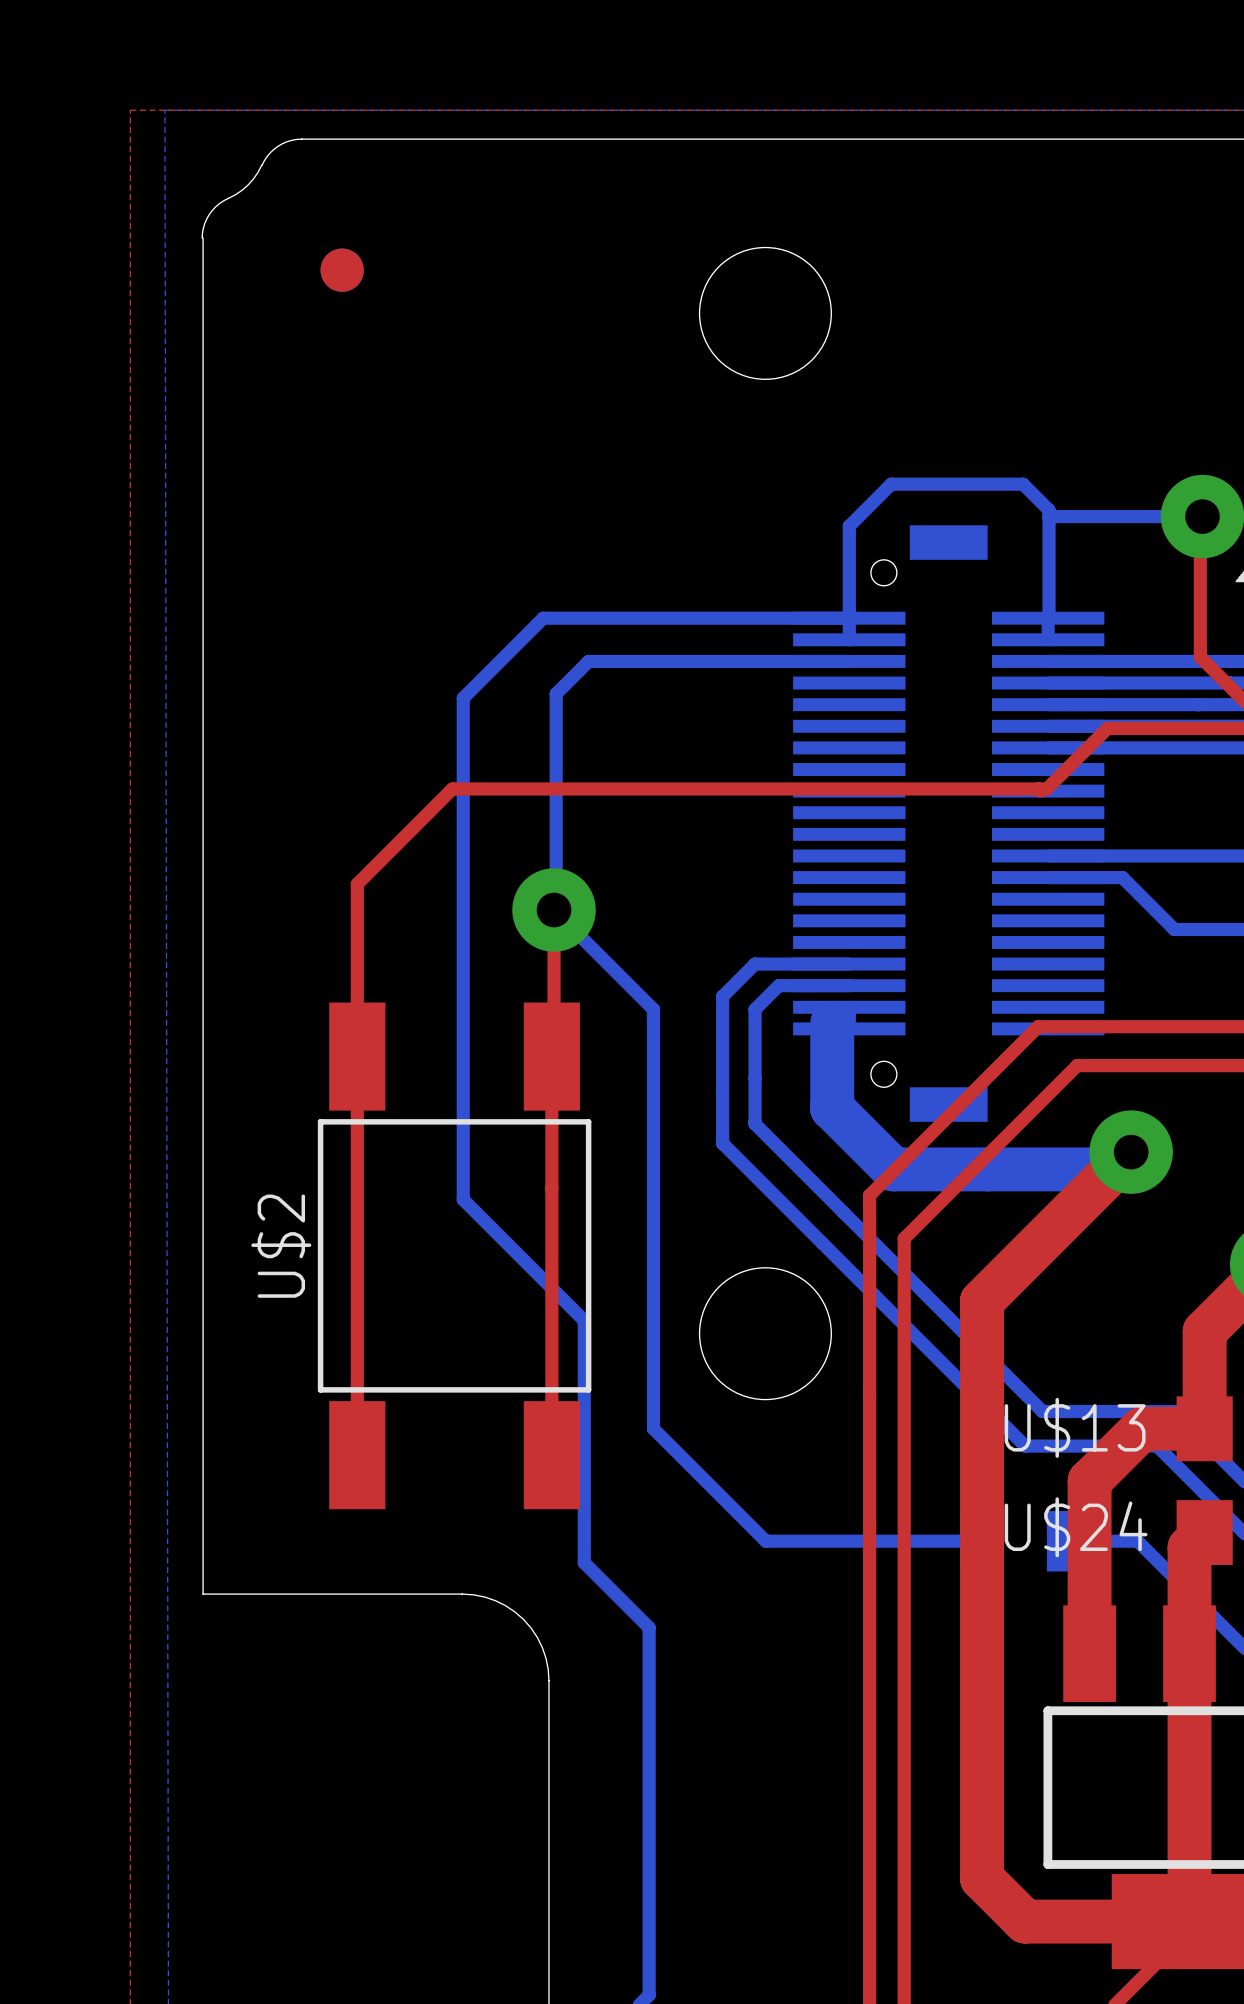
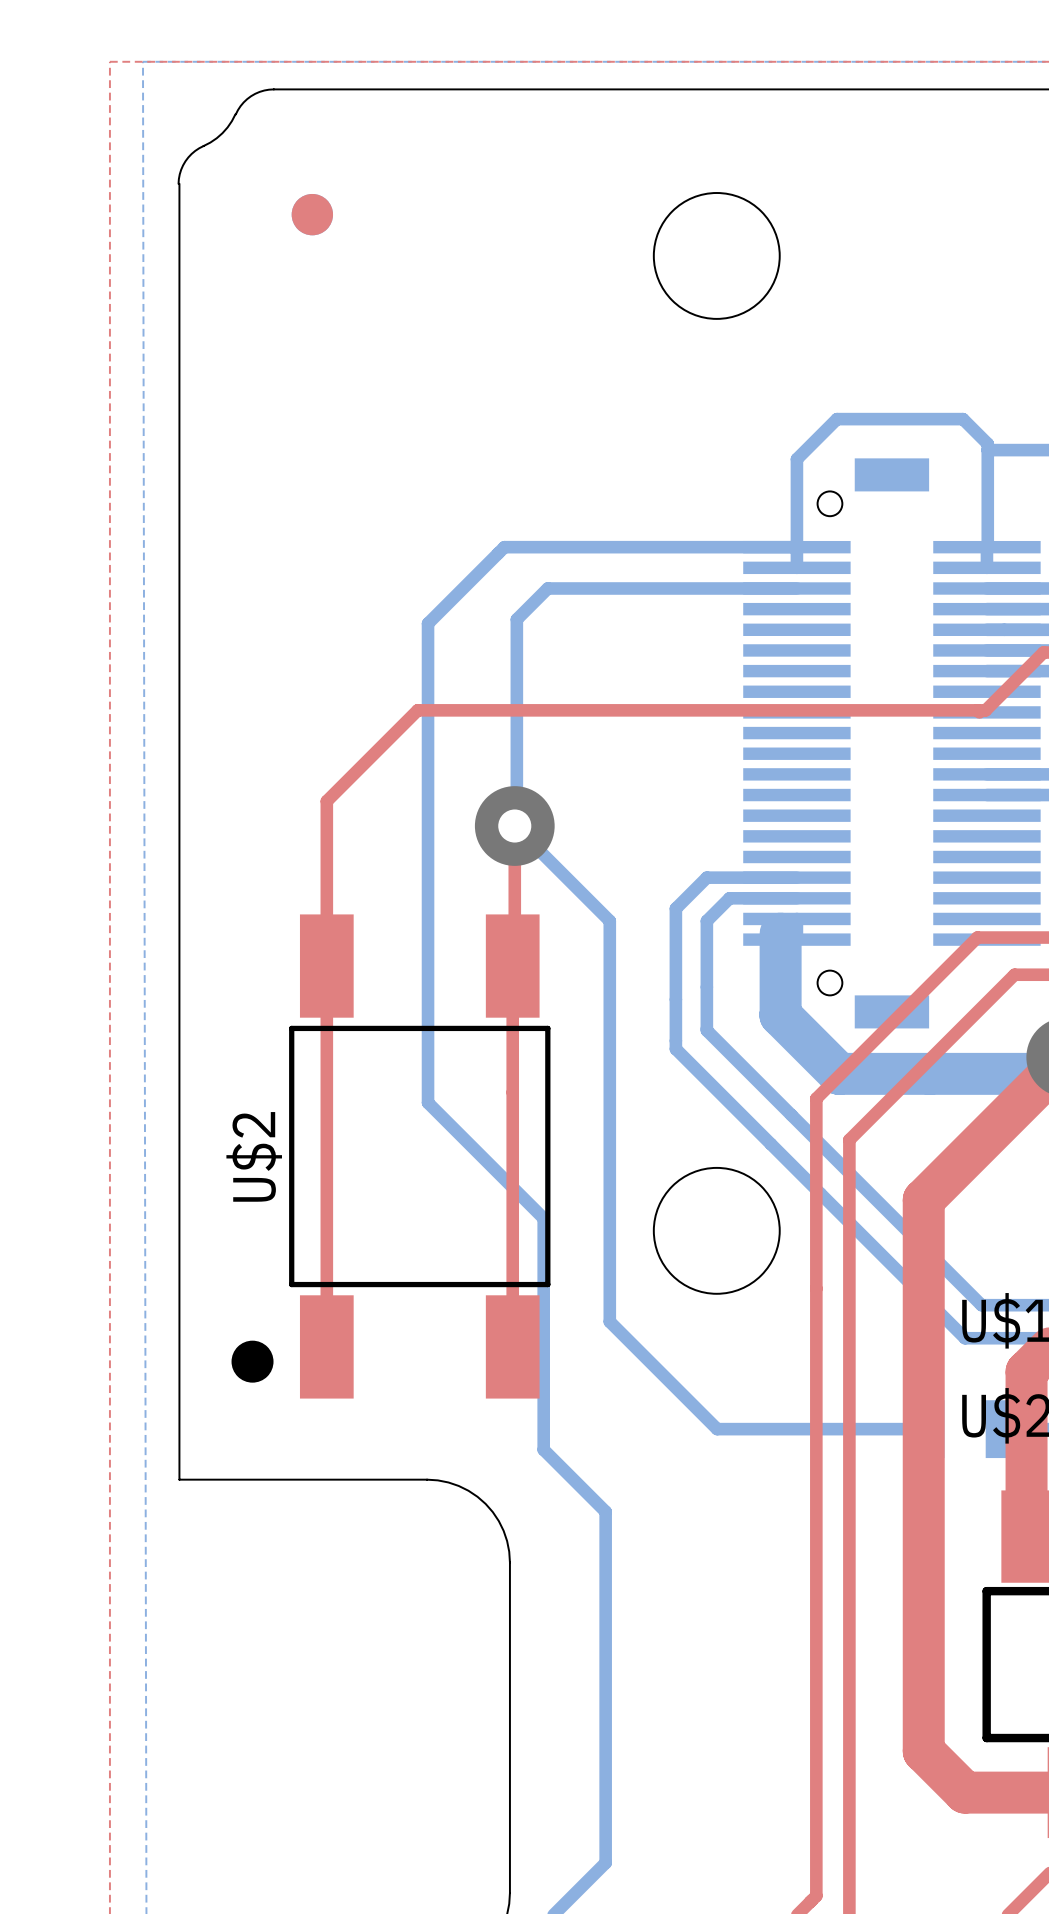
U$2 footprint: [317, 1002, 592, 1510] -> [231, 914, 551, 1399]

